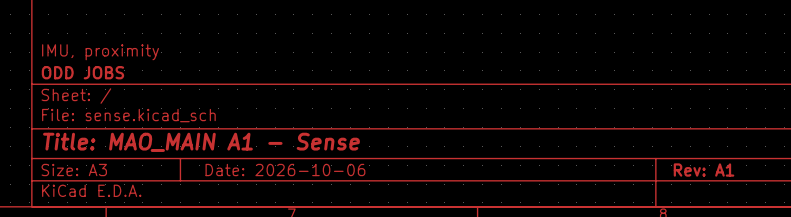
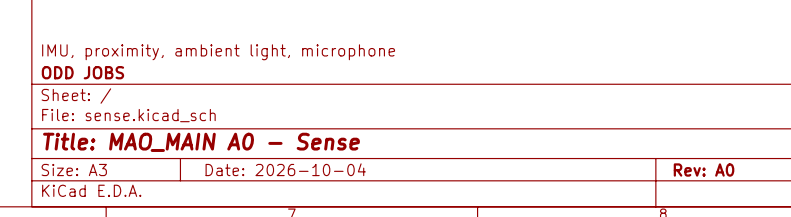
title block: IMU, proximity (100, 52) -> IMU, proximity, ambient light, microphone (218, 52)
title block: Title: MAO_MAIN A1 - Sense (201, 142) -> Title: MAO_MAIN A0 - Sense (201, 142)
title block: Date: 2026-10-06 (285, 170) -> Date: 2026-10-04 (285, 169)
title block: Rev: A1 (704, 170) -> Rev: A0 (704, 170)

